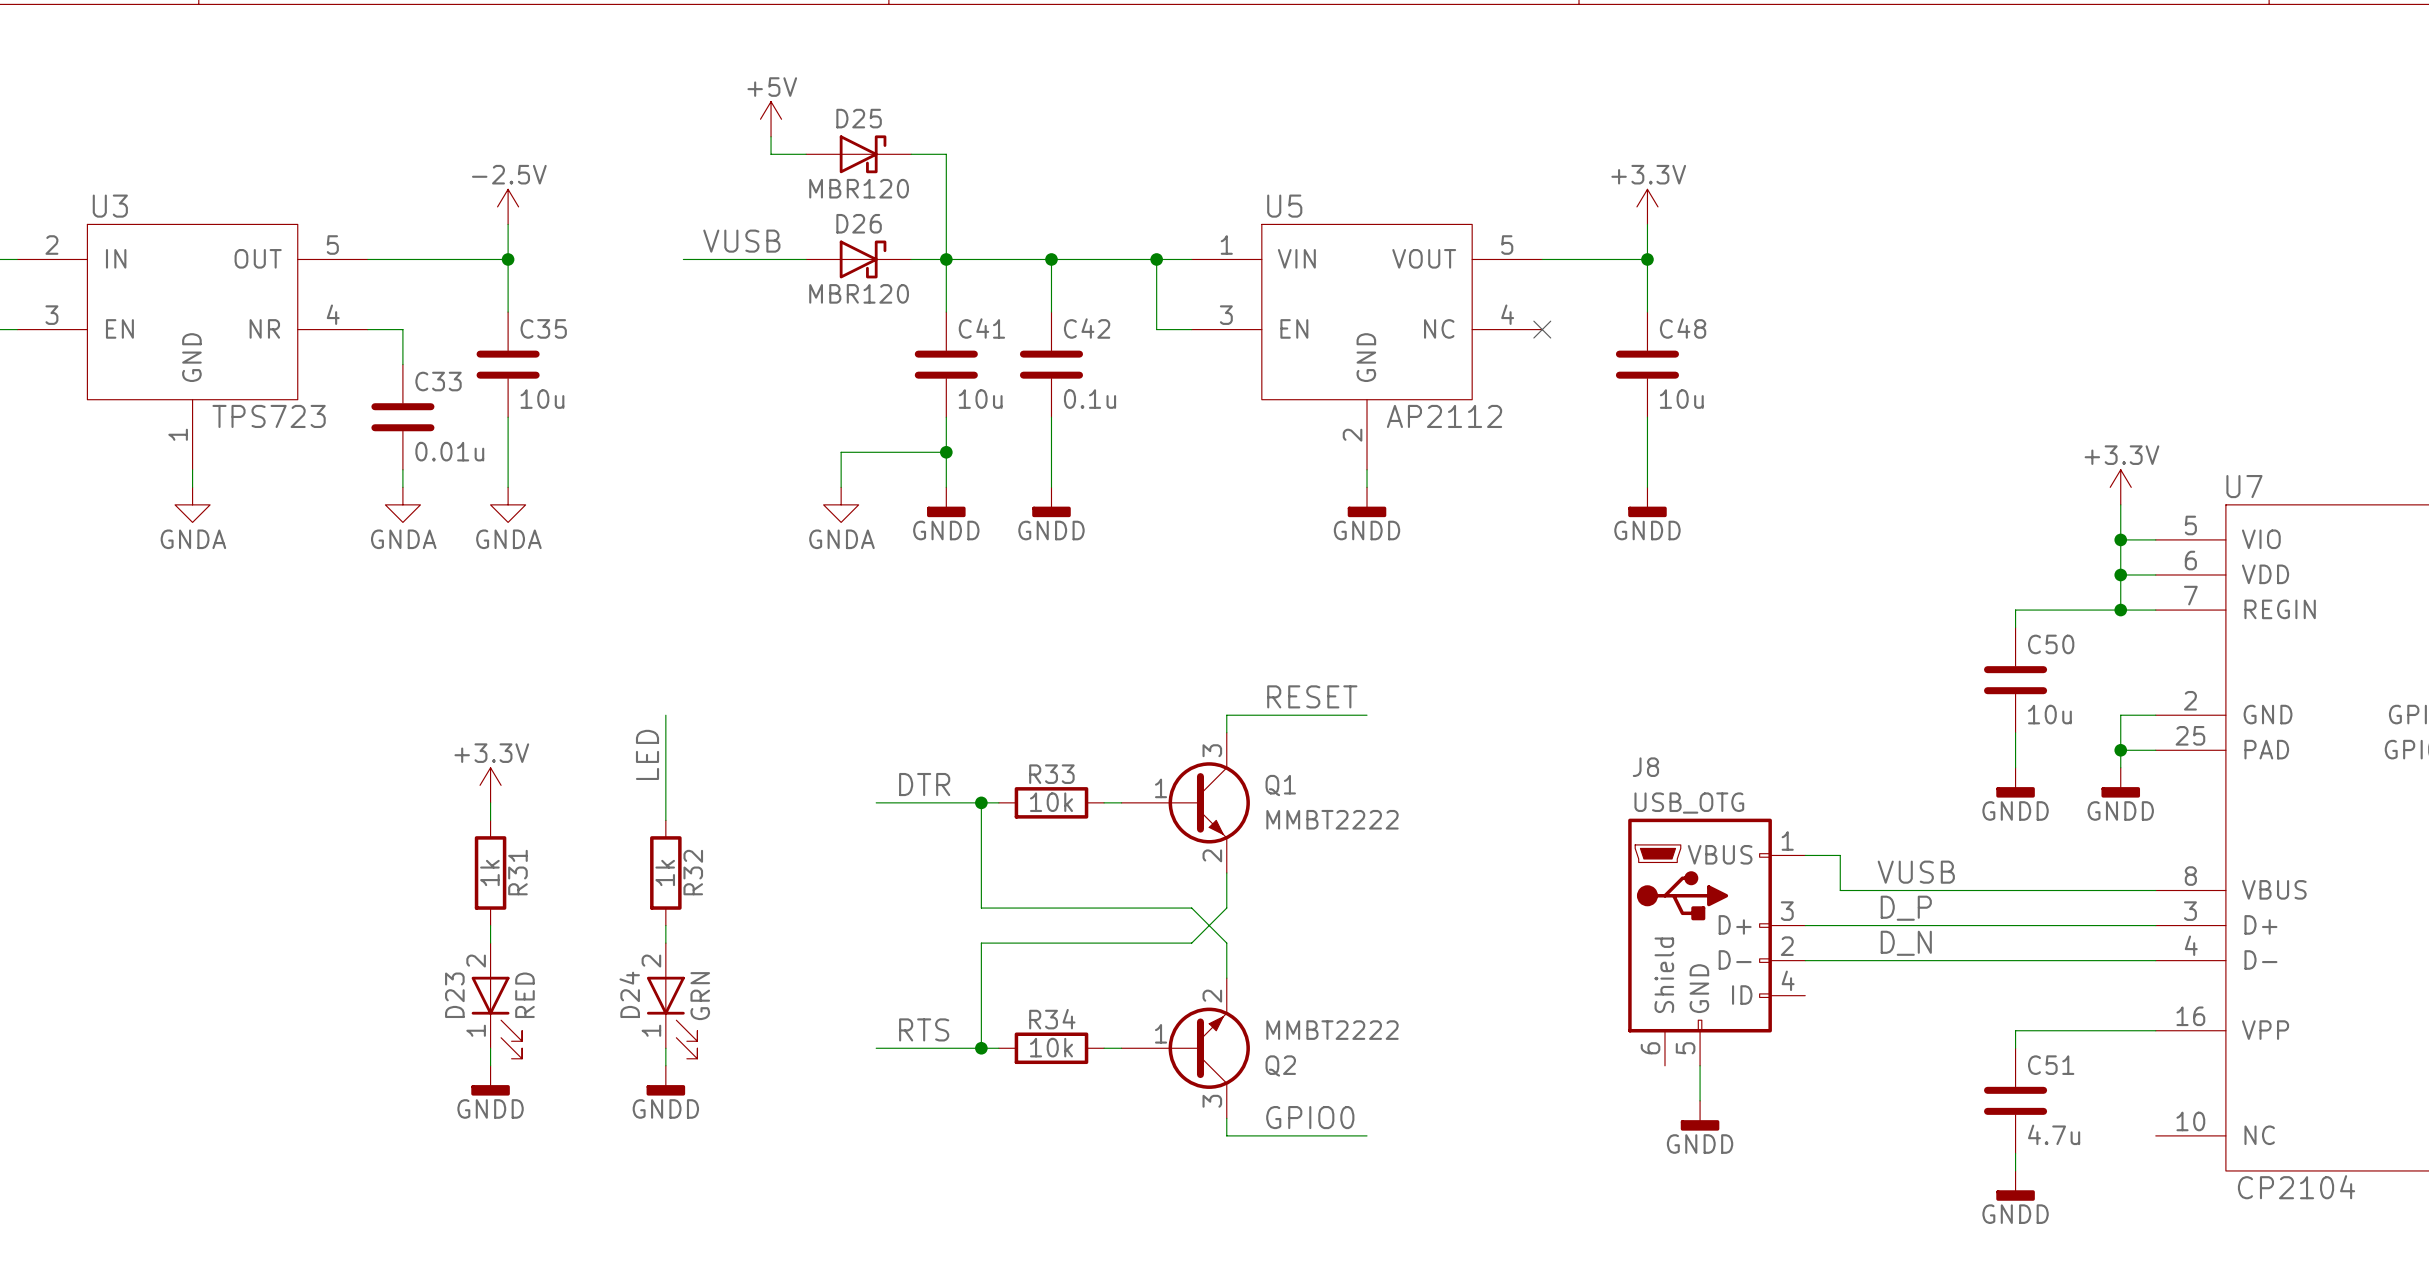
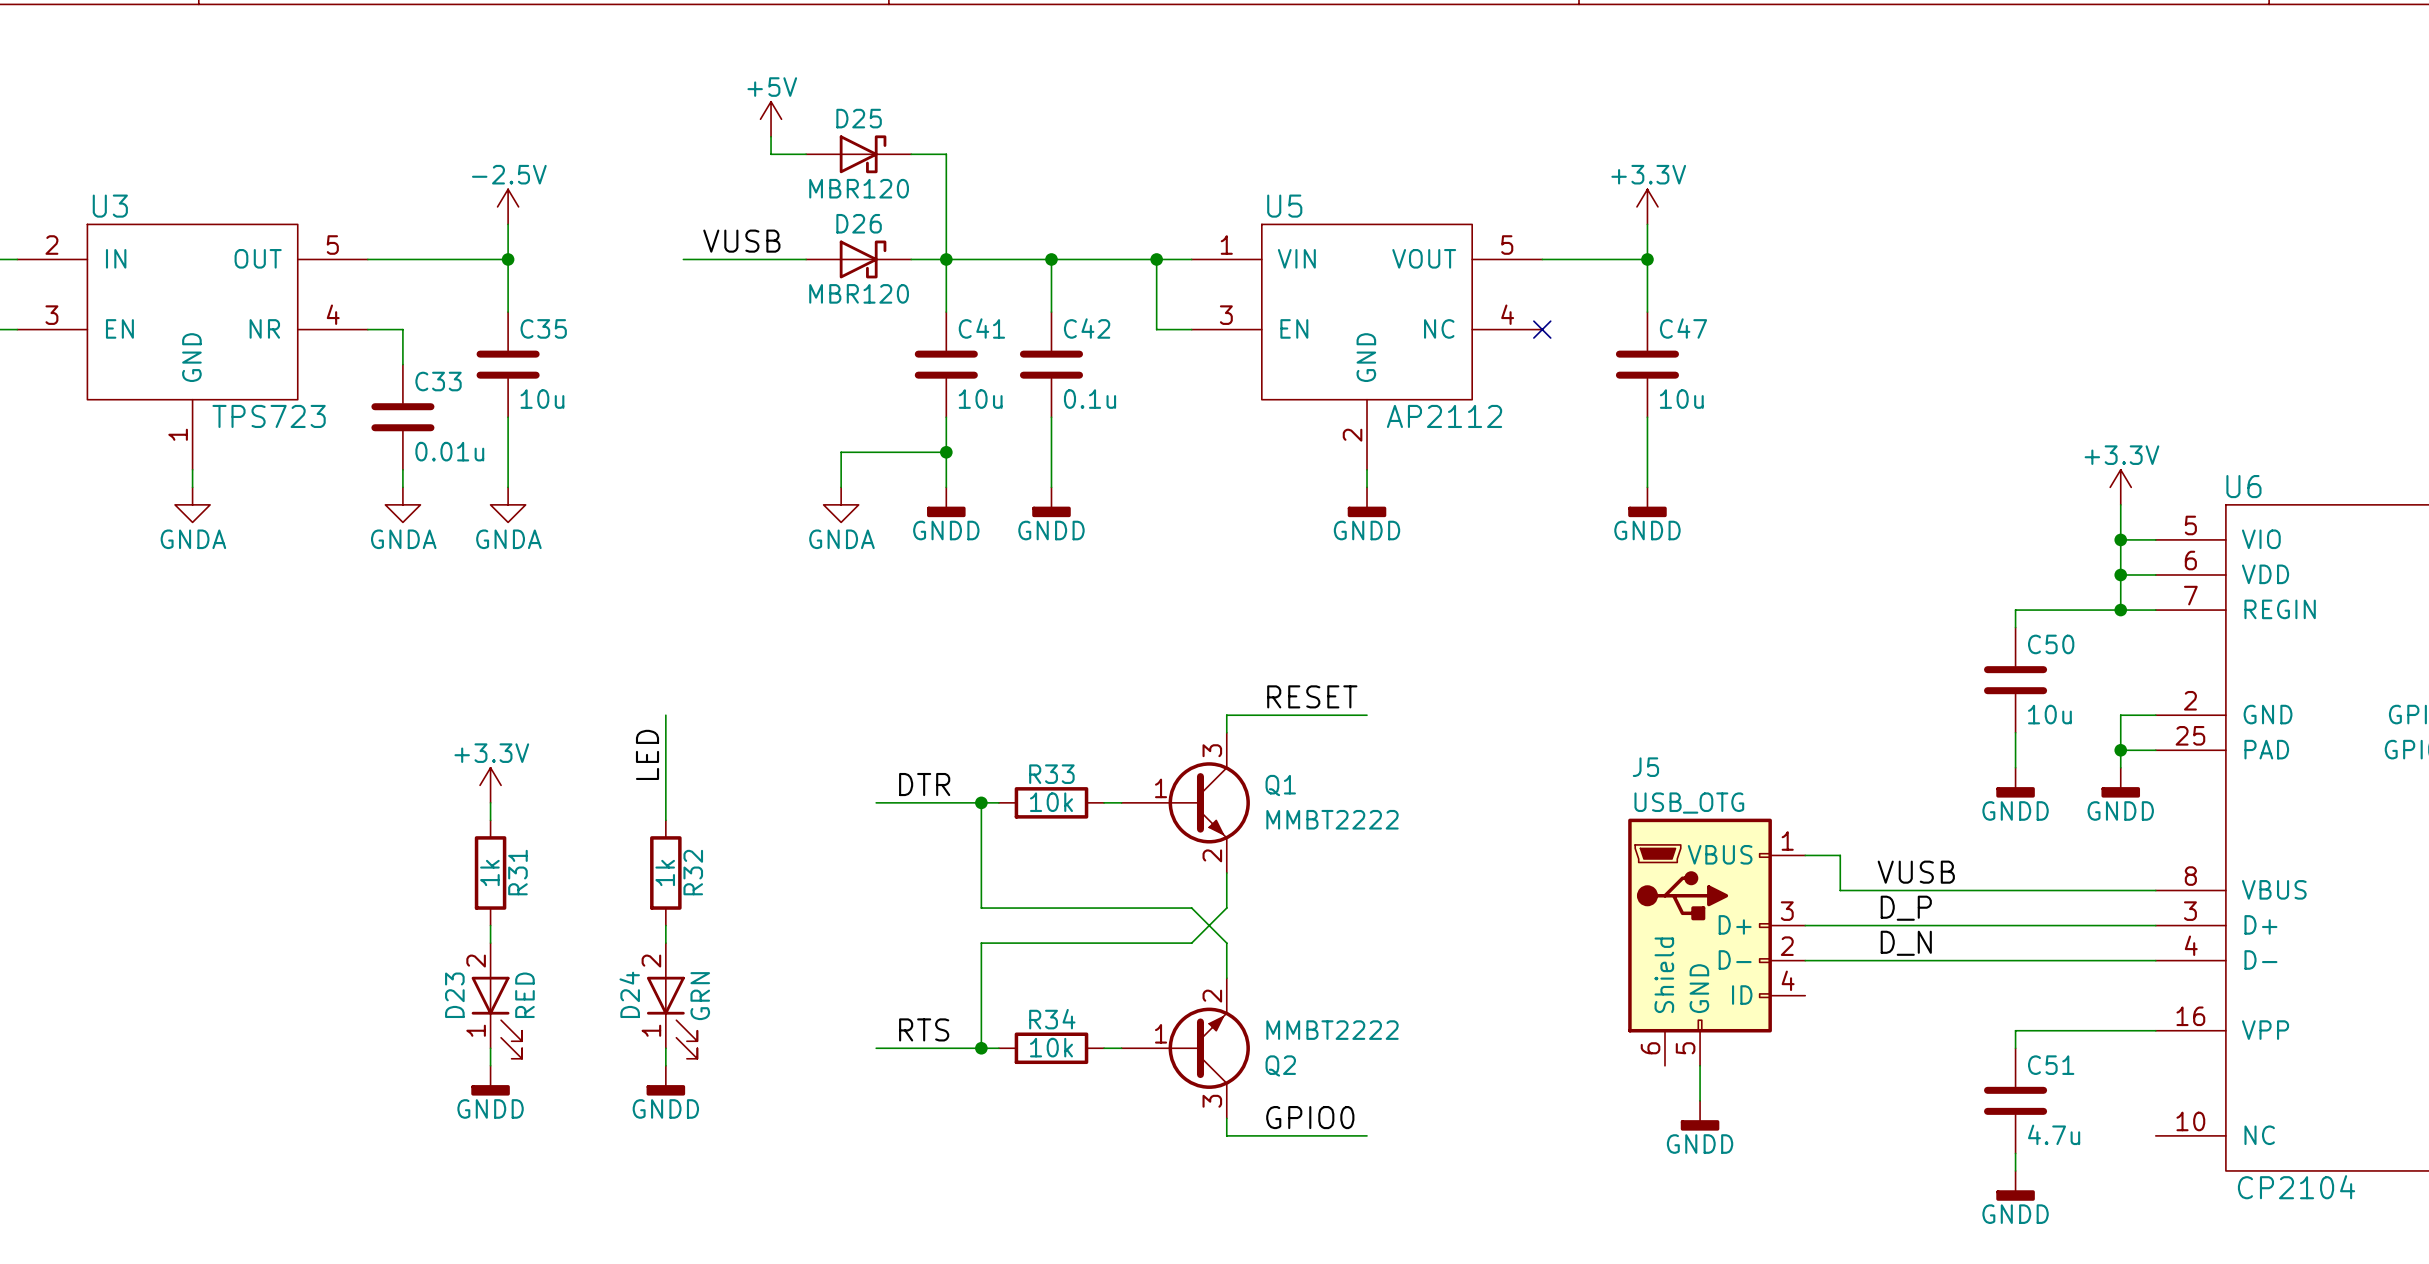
C48 name: C48 (1683, 328) -> C47 (1683, 328)
U7 name: U7 (2244, 486) -> U6 (2243, 486)
J8 name: J8 (1645, 767) -> J5 (1645, 767)

